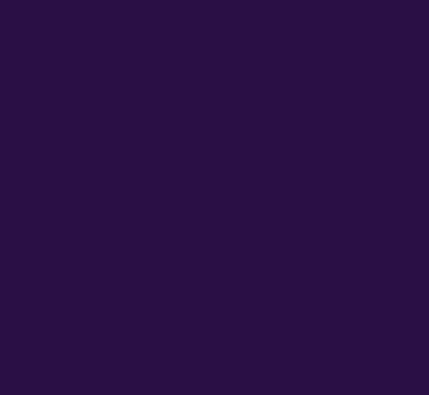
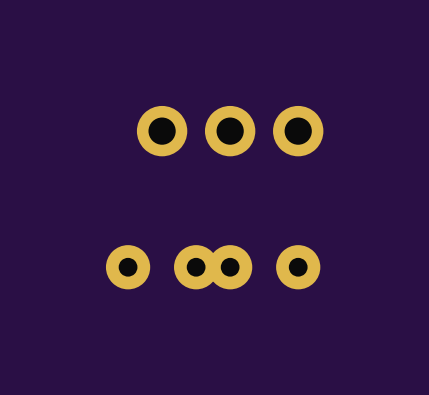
part: none -> (230, 131)
part: none -> (162, 267)
part: none -> (264, 267)

